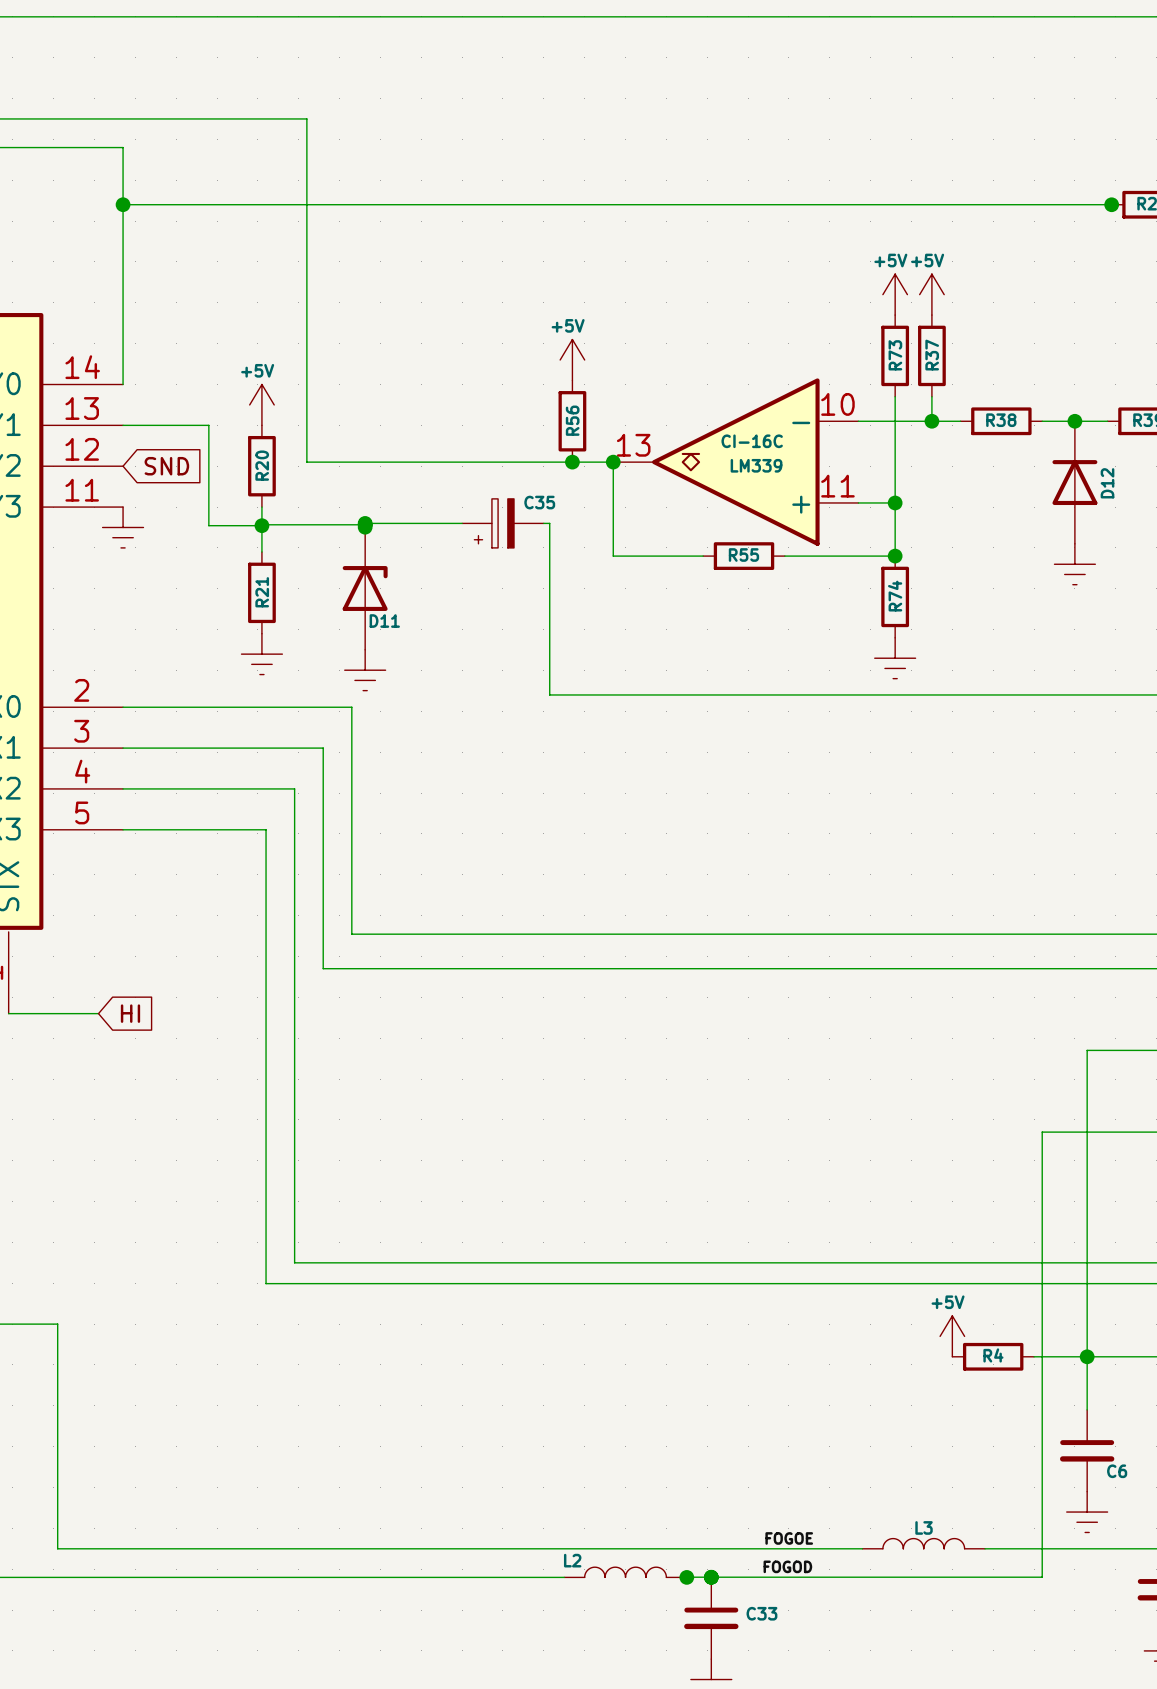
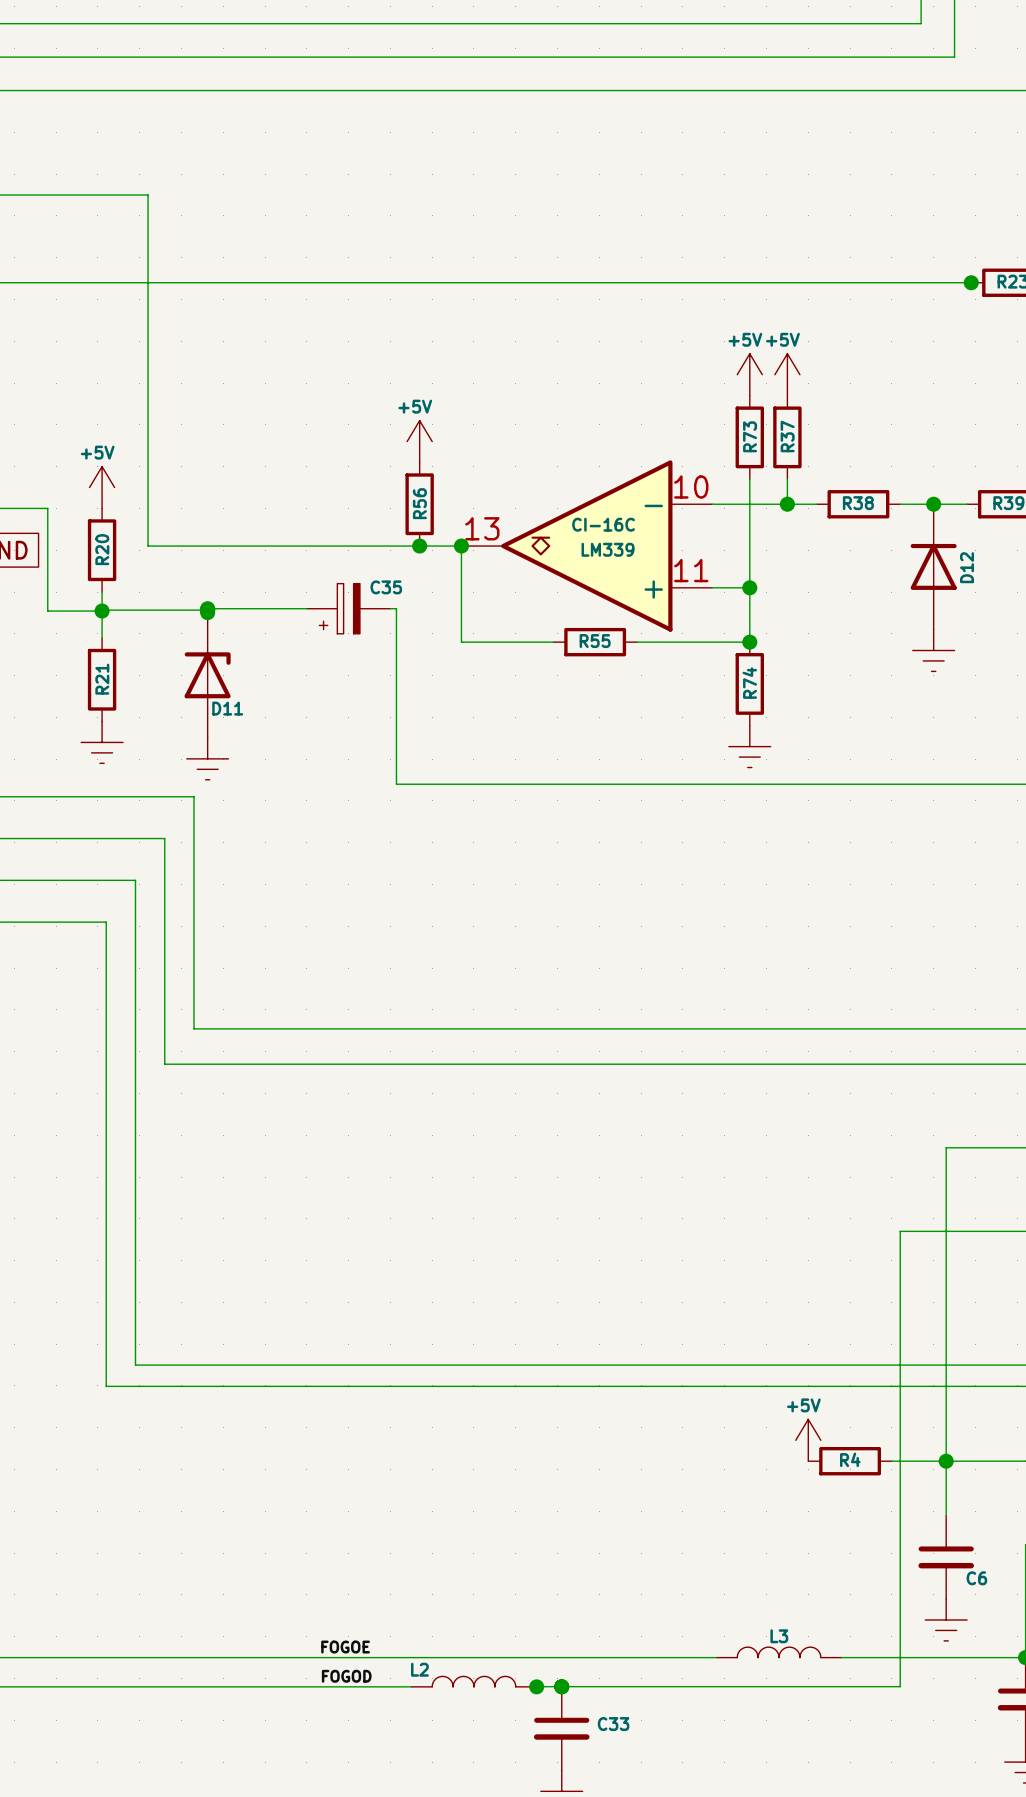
label position: FOGOE (789, 1538) -> FOGOE (345, 1647)
label position: FOGOD (787, 1566) -> FOGOD (346, 1676)

